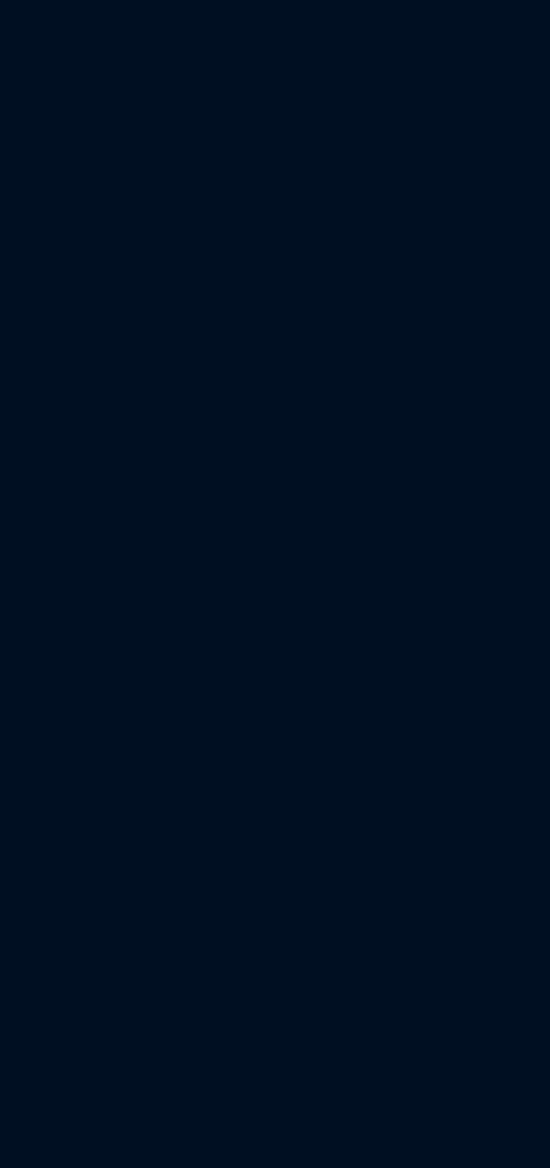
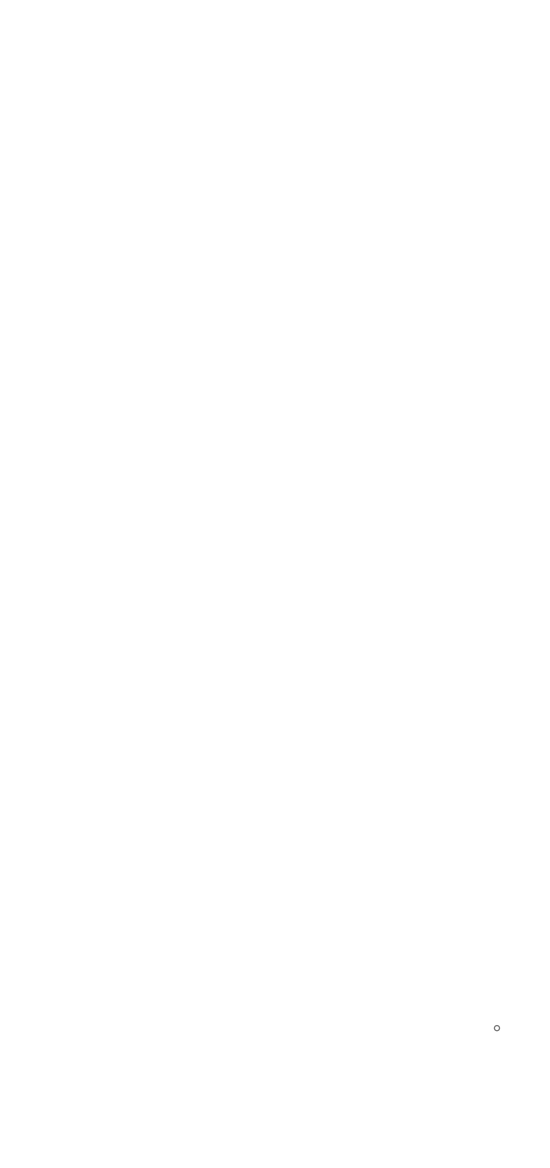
via: none -> (496, 1028)

